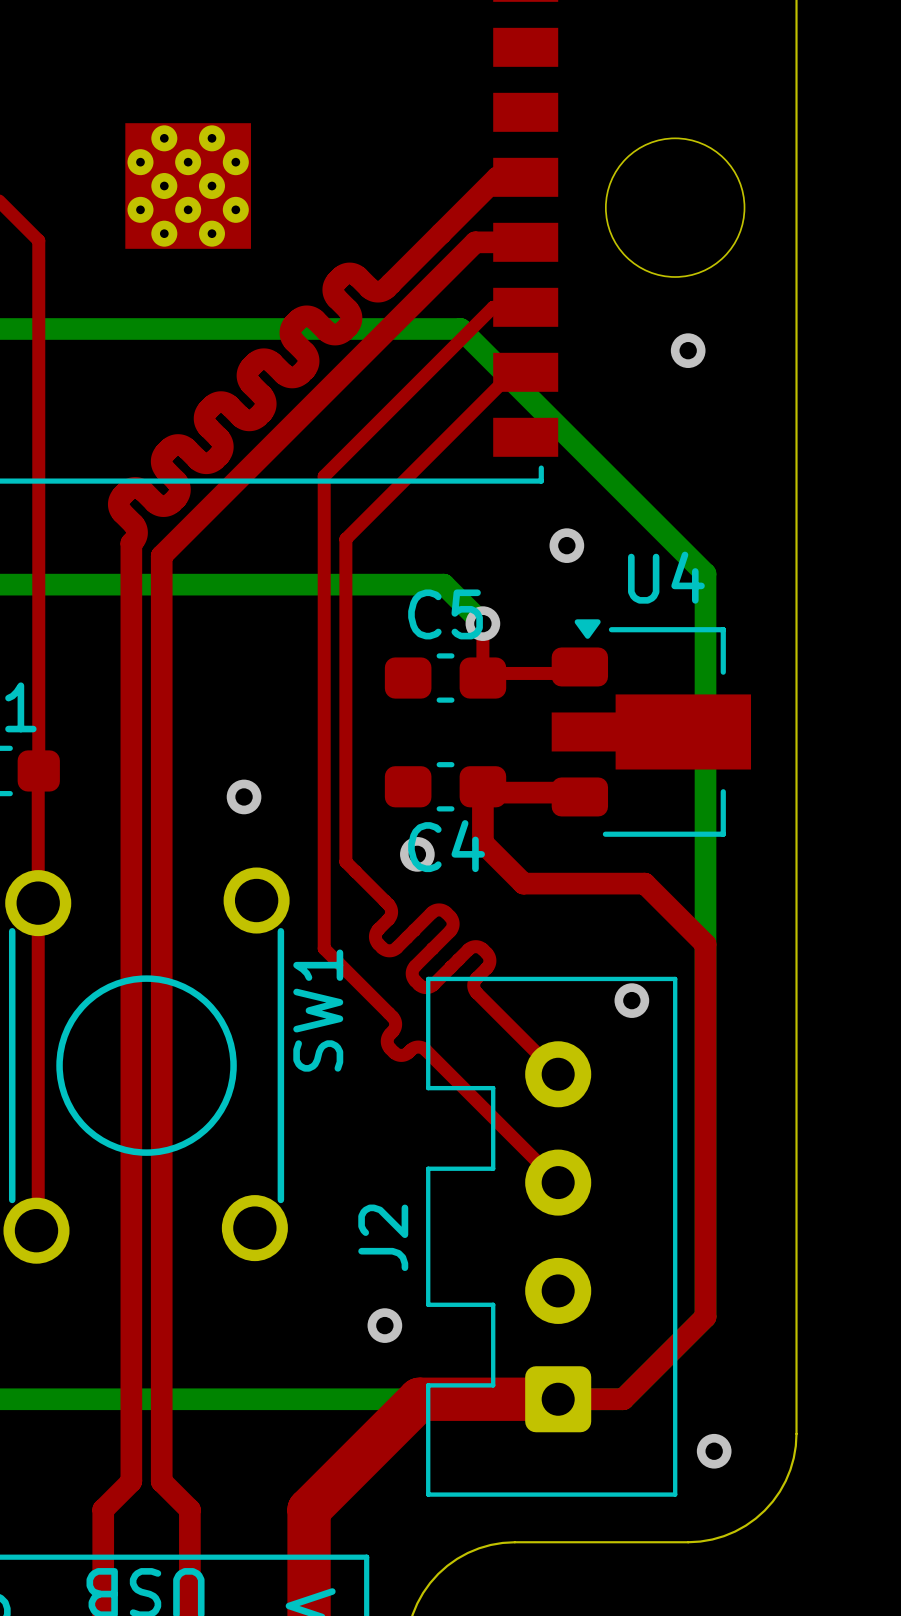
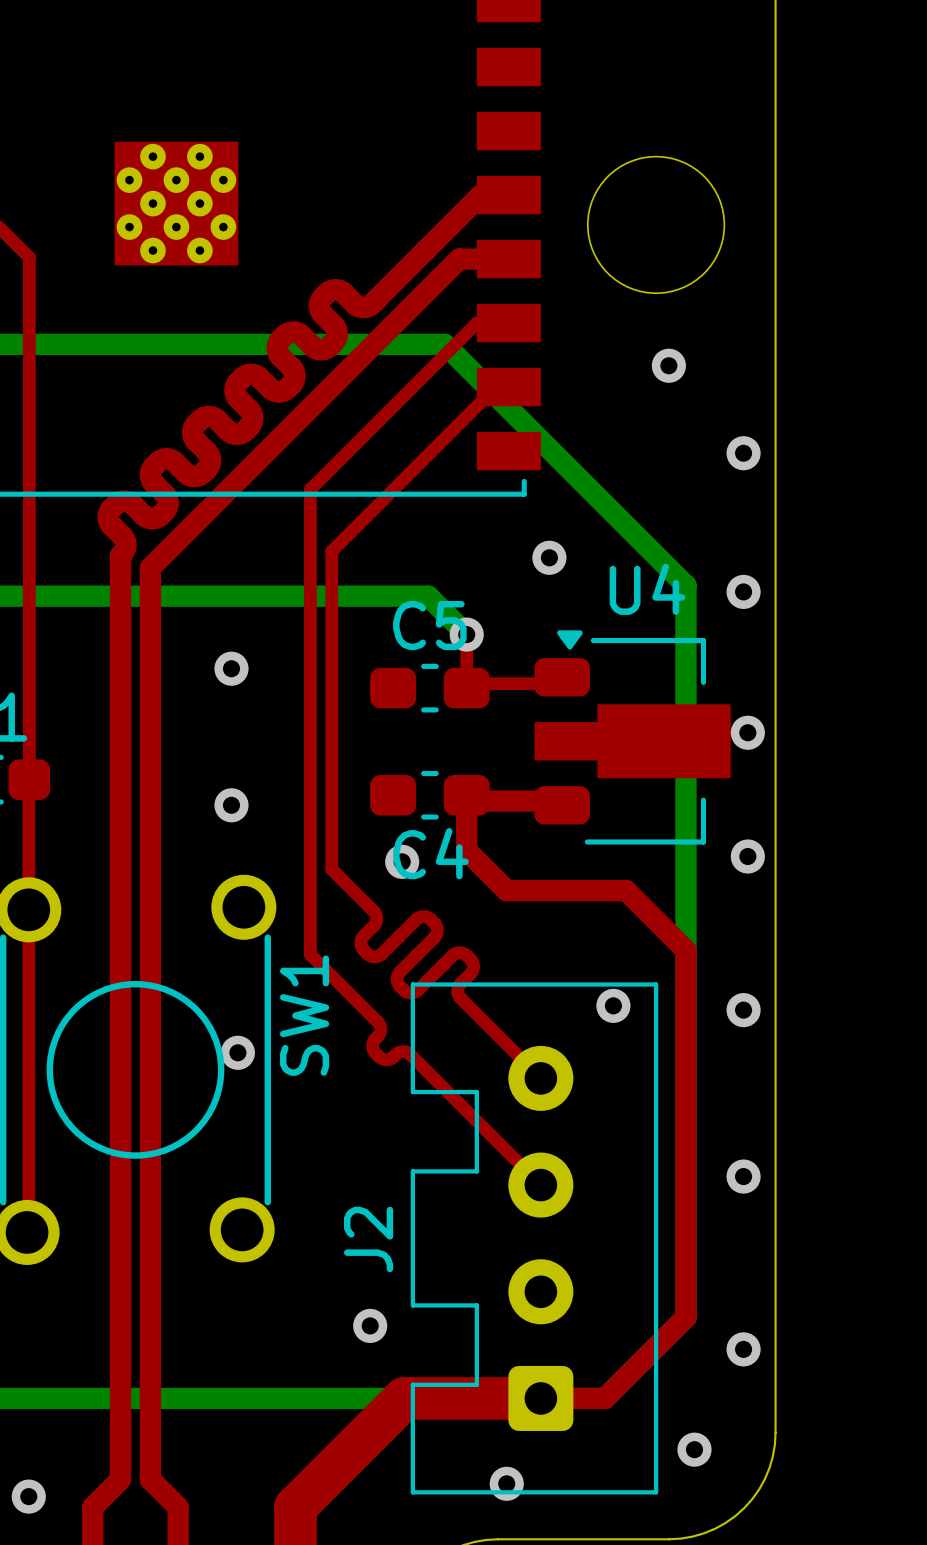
via: none -> (743, 453)
via: none -> (743, 591)
via: none -> (231, 668)
via: none -> (747, 732)
via: none -> (747, 856)
via: none -> (743, 1010)
via: none -> (237, 1052)
via: none -> (743, 1176)
via: none -> (743, 1349)
via: none -> (506, 1483)
via: none -> (28, 1496)

